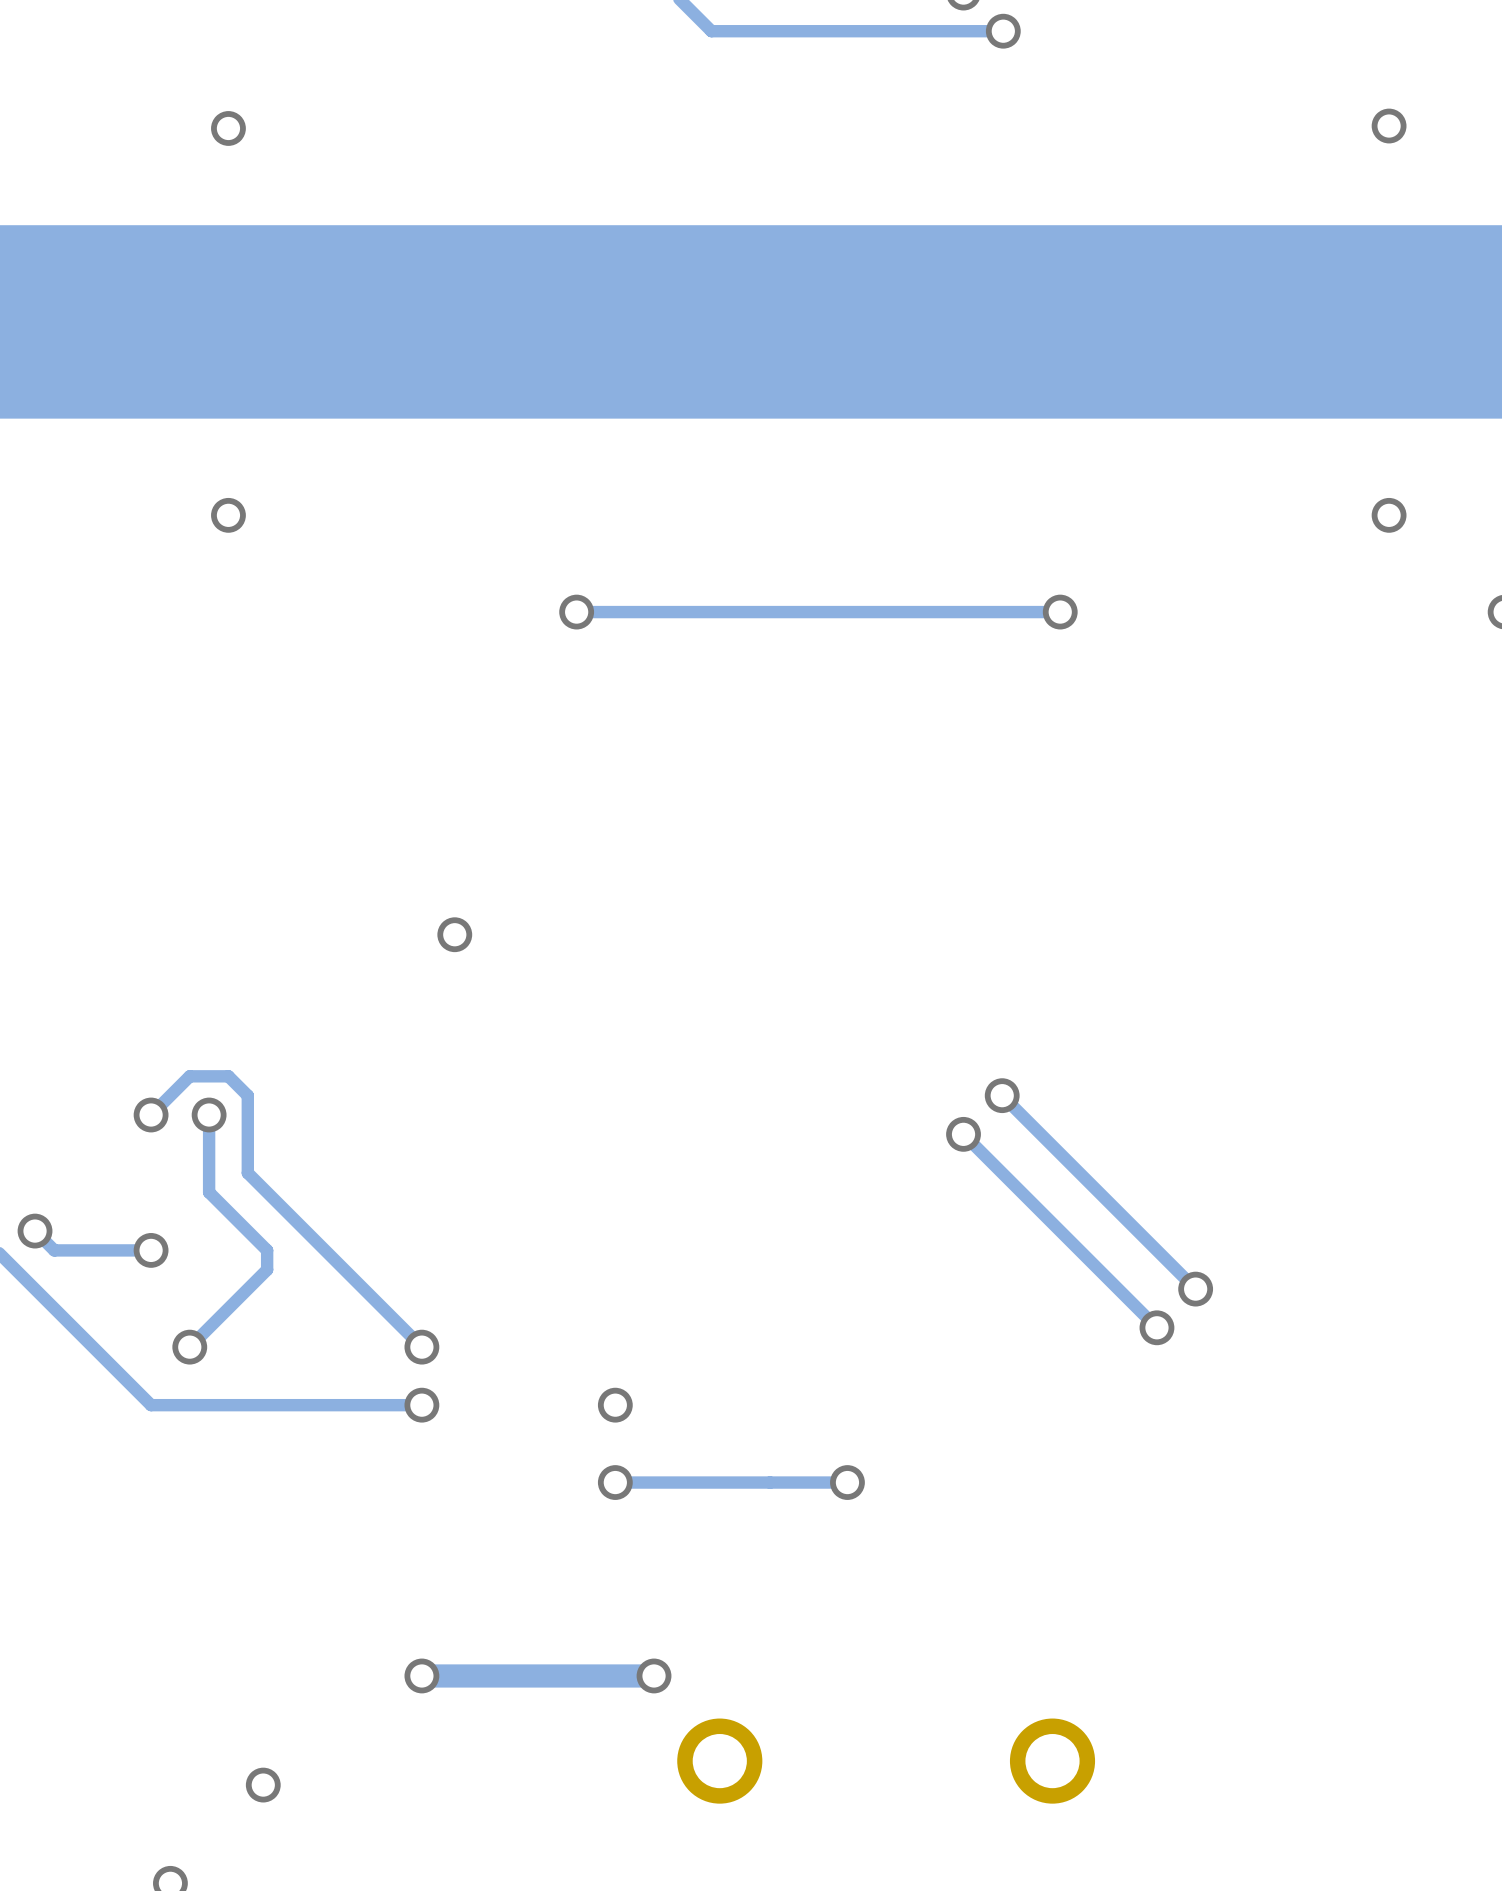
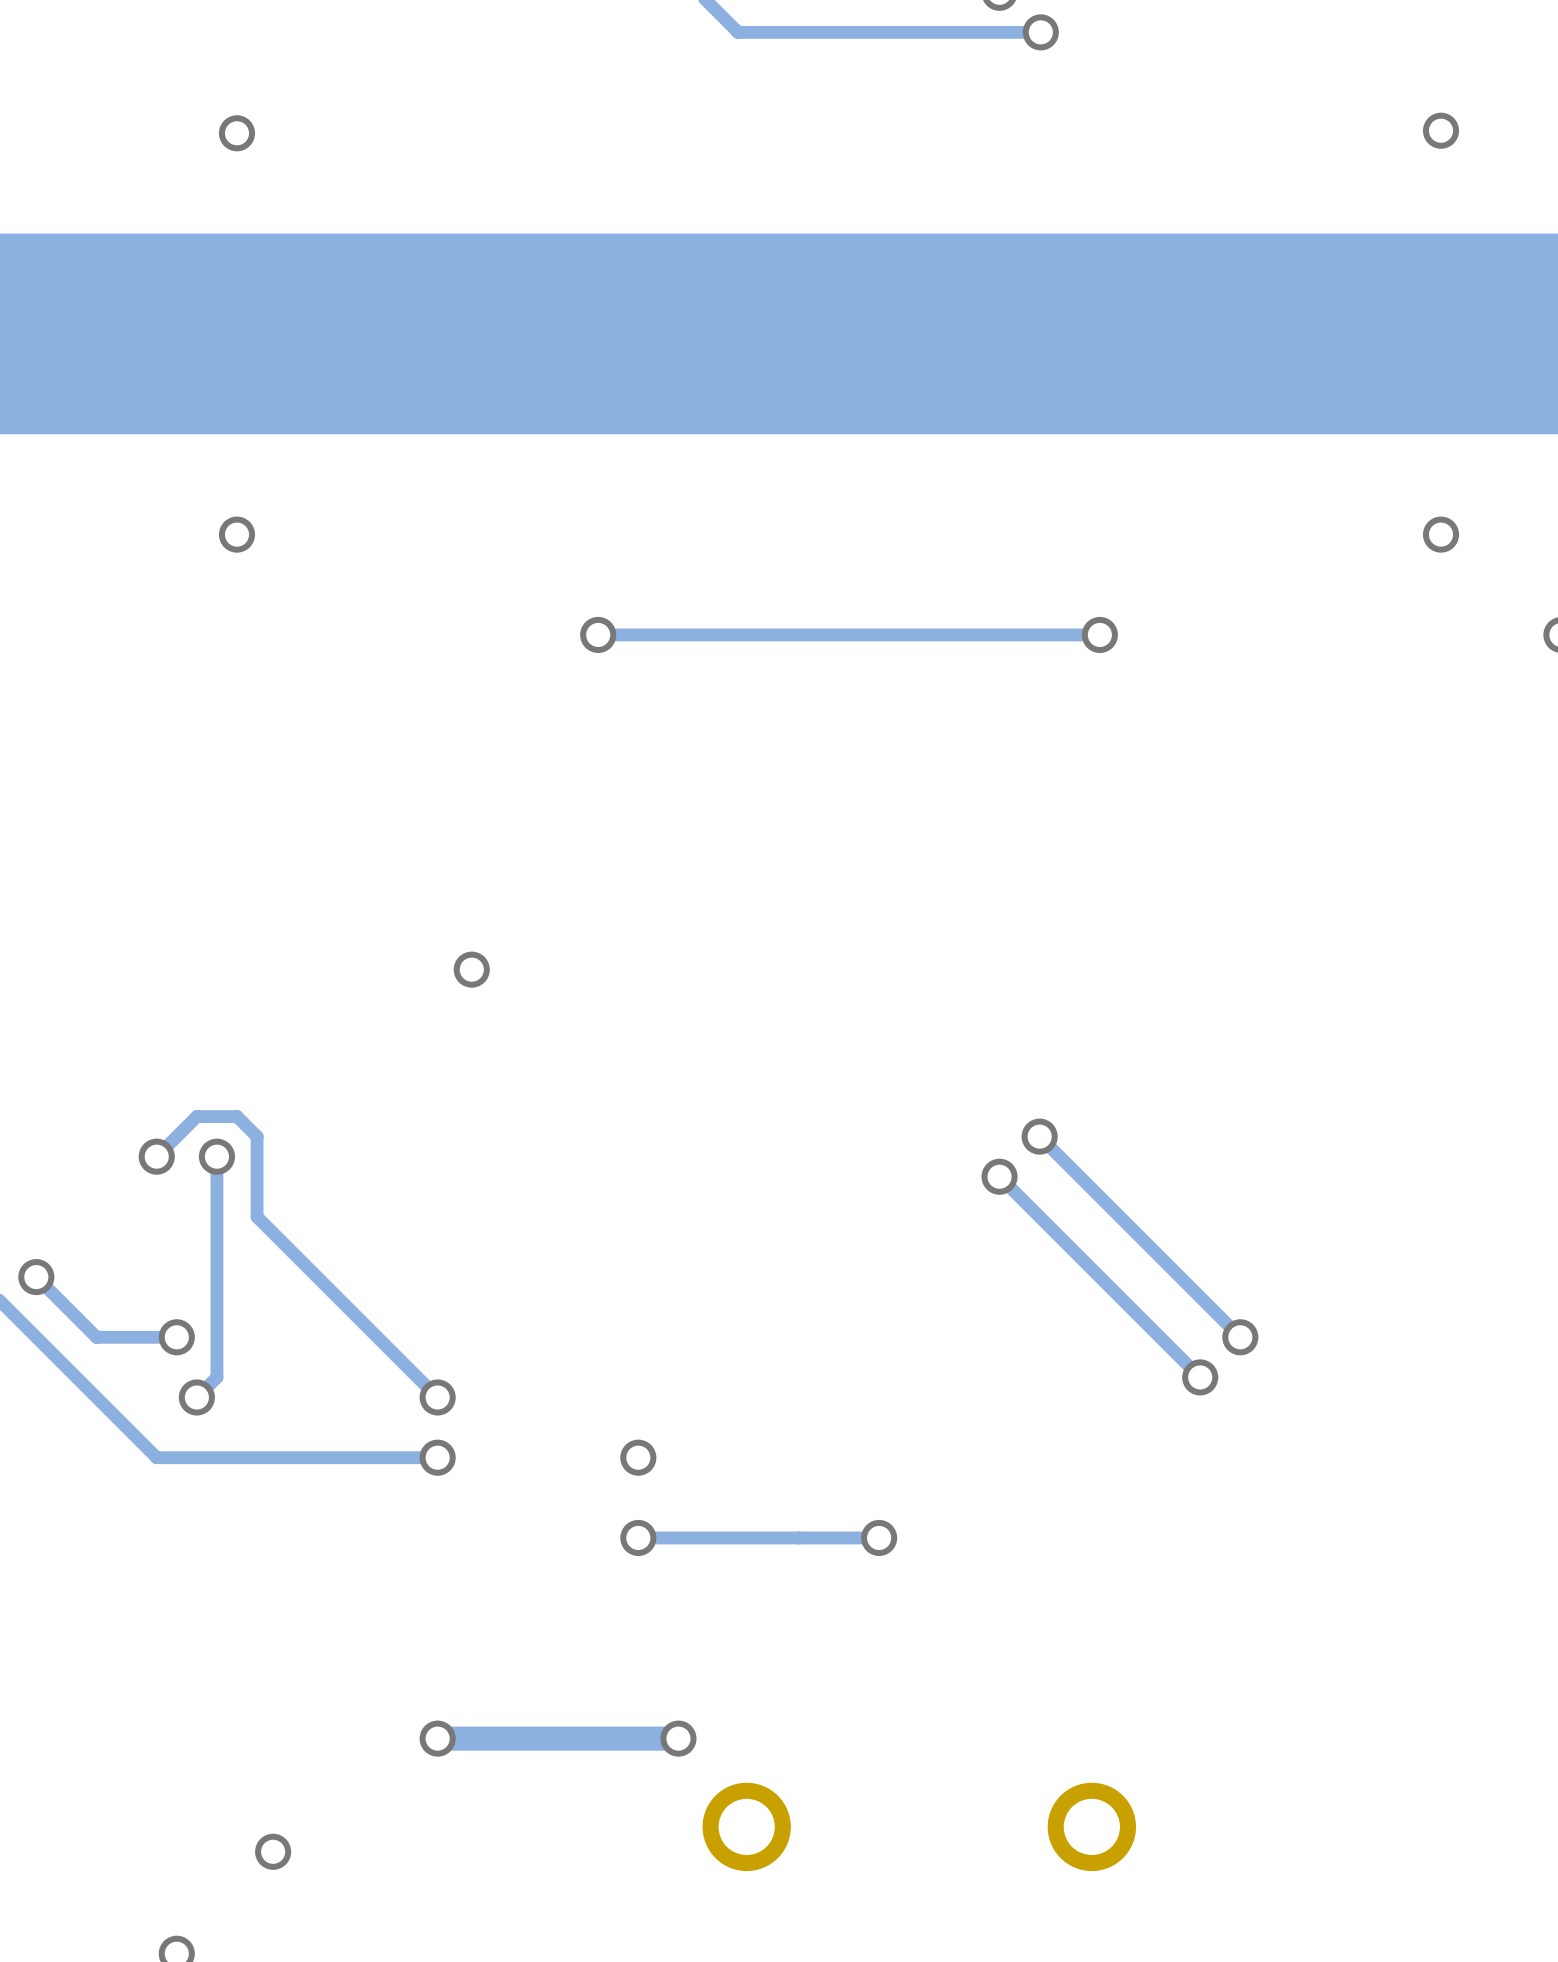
track: (209, 1192) (267, 1250) (267, 1269) (209, 1327) -> (216, 1236) (216, 1377)
track: (151, 1250) (54, 1250) -> (176, 1337) (96, 1337) (56, 1297)
via position: (151, 1250) -> (176, 1337)

